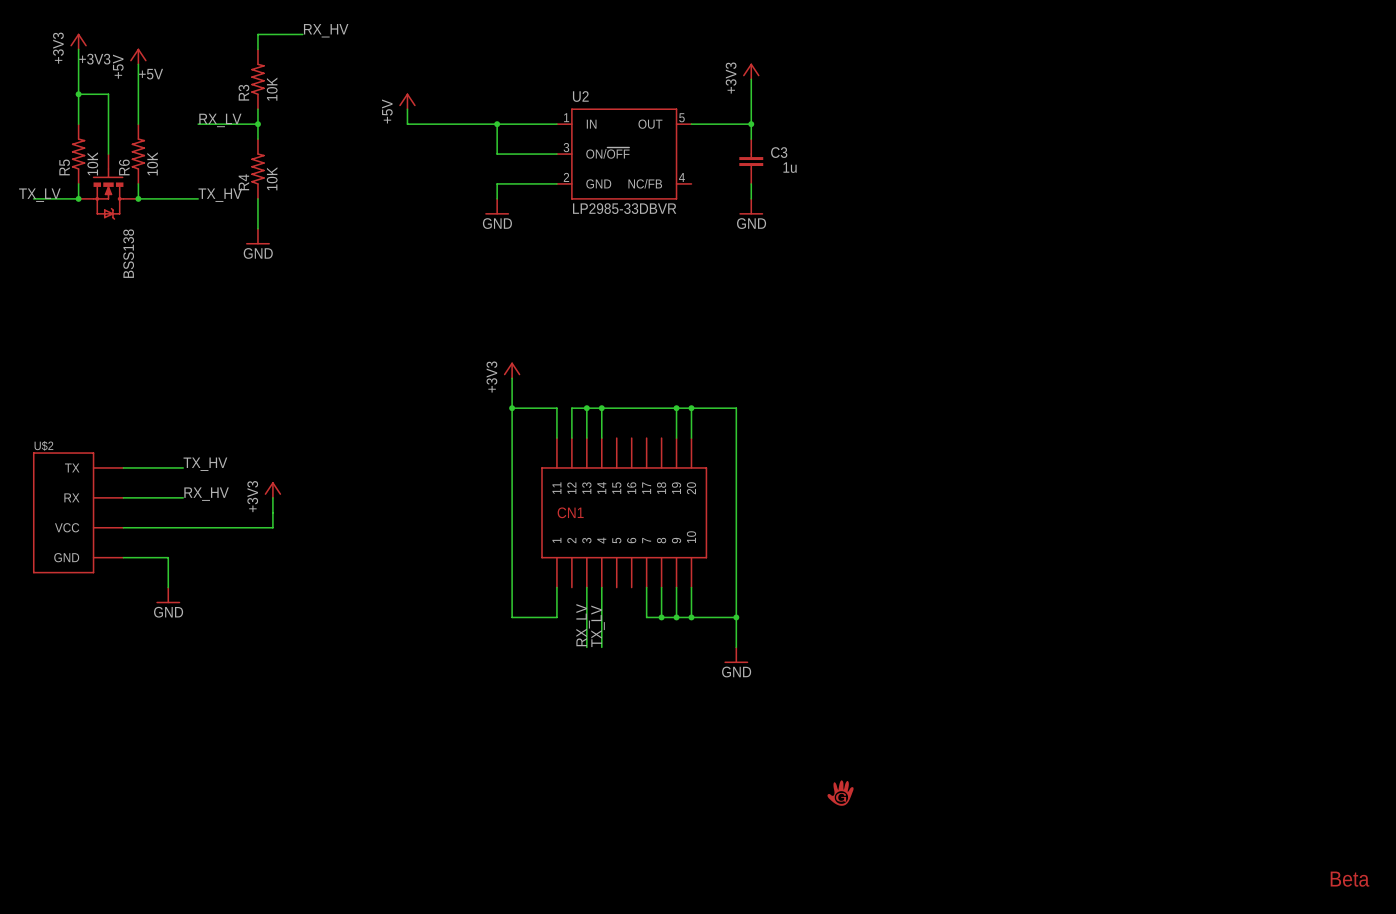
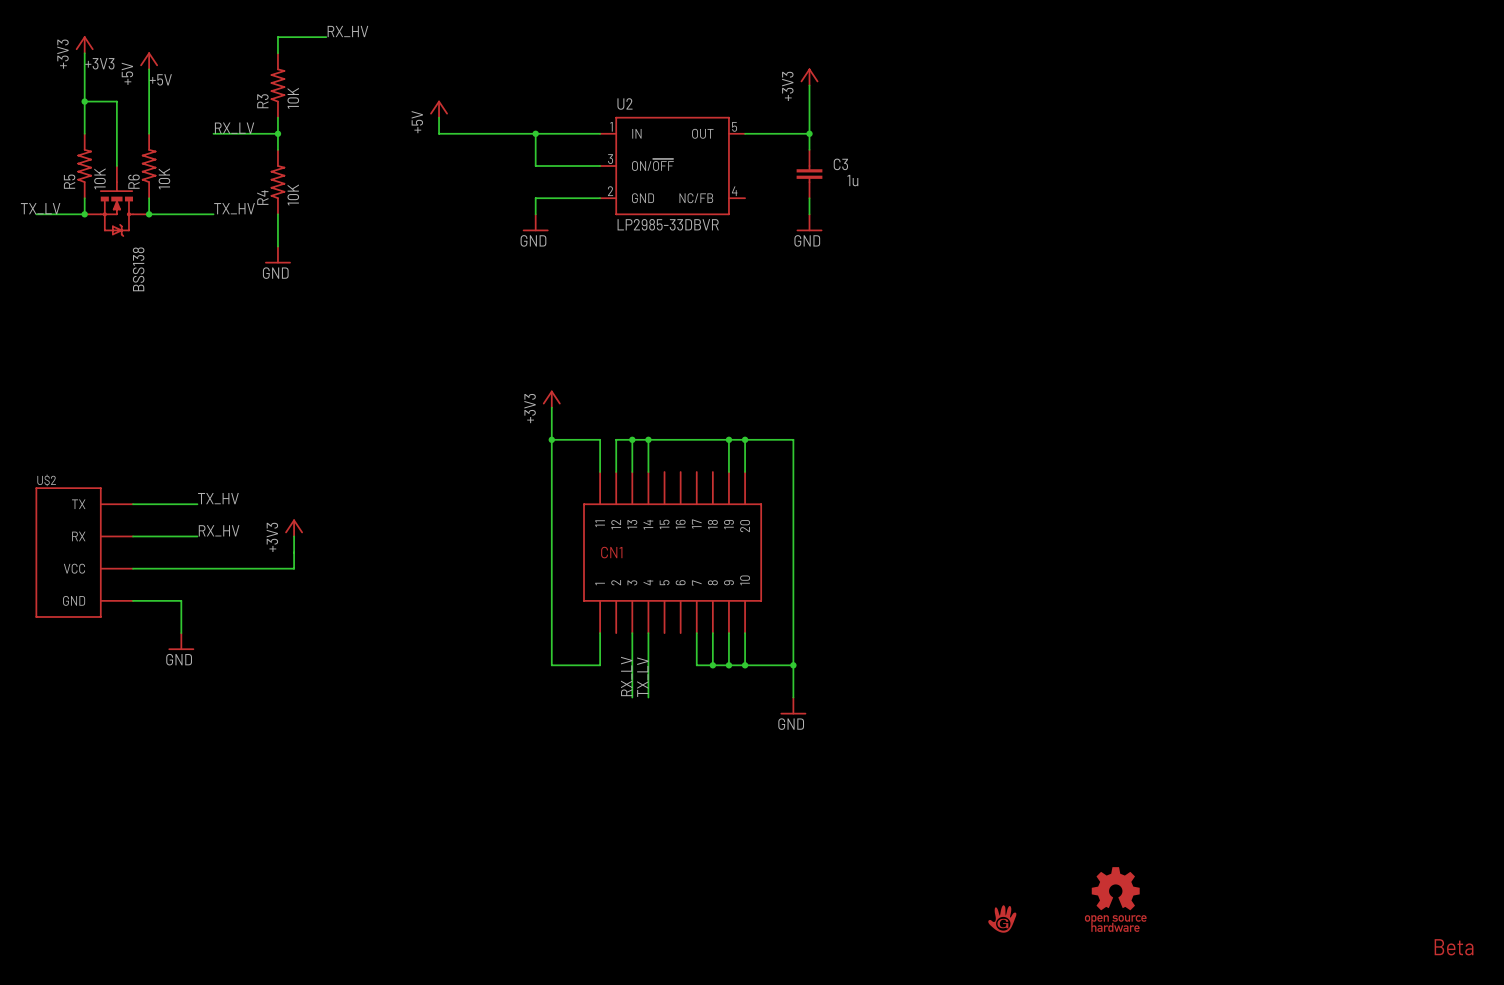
part position: (840, 793) -> (1002, 918)
part: none -> (1115, 899)

